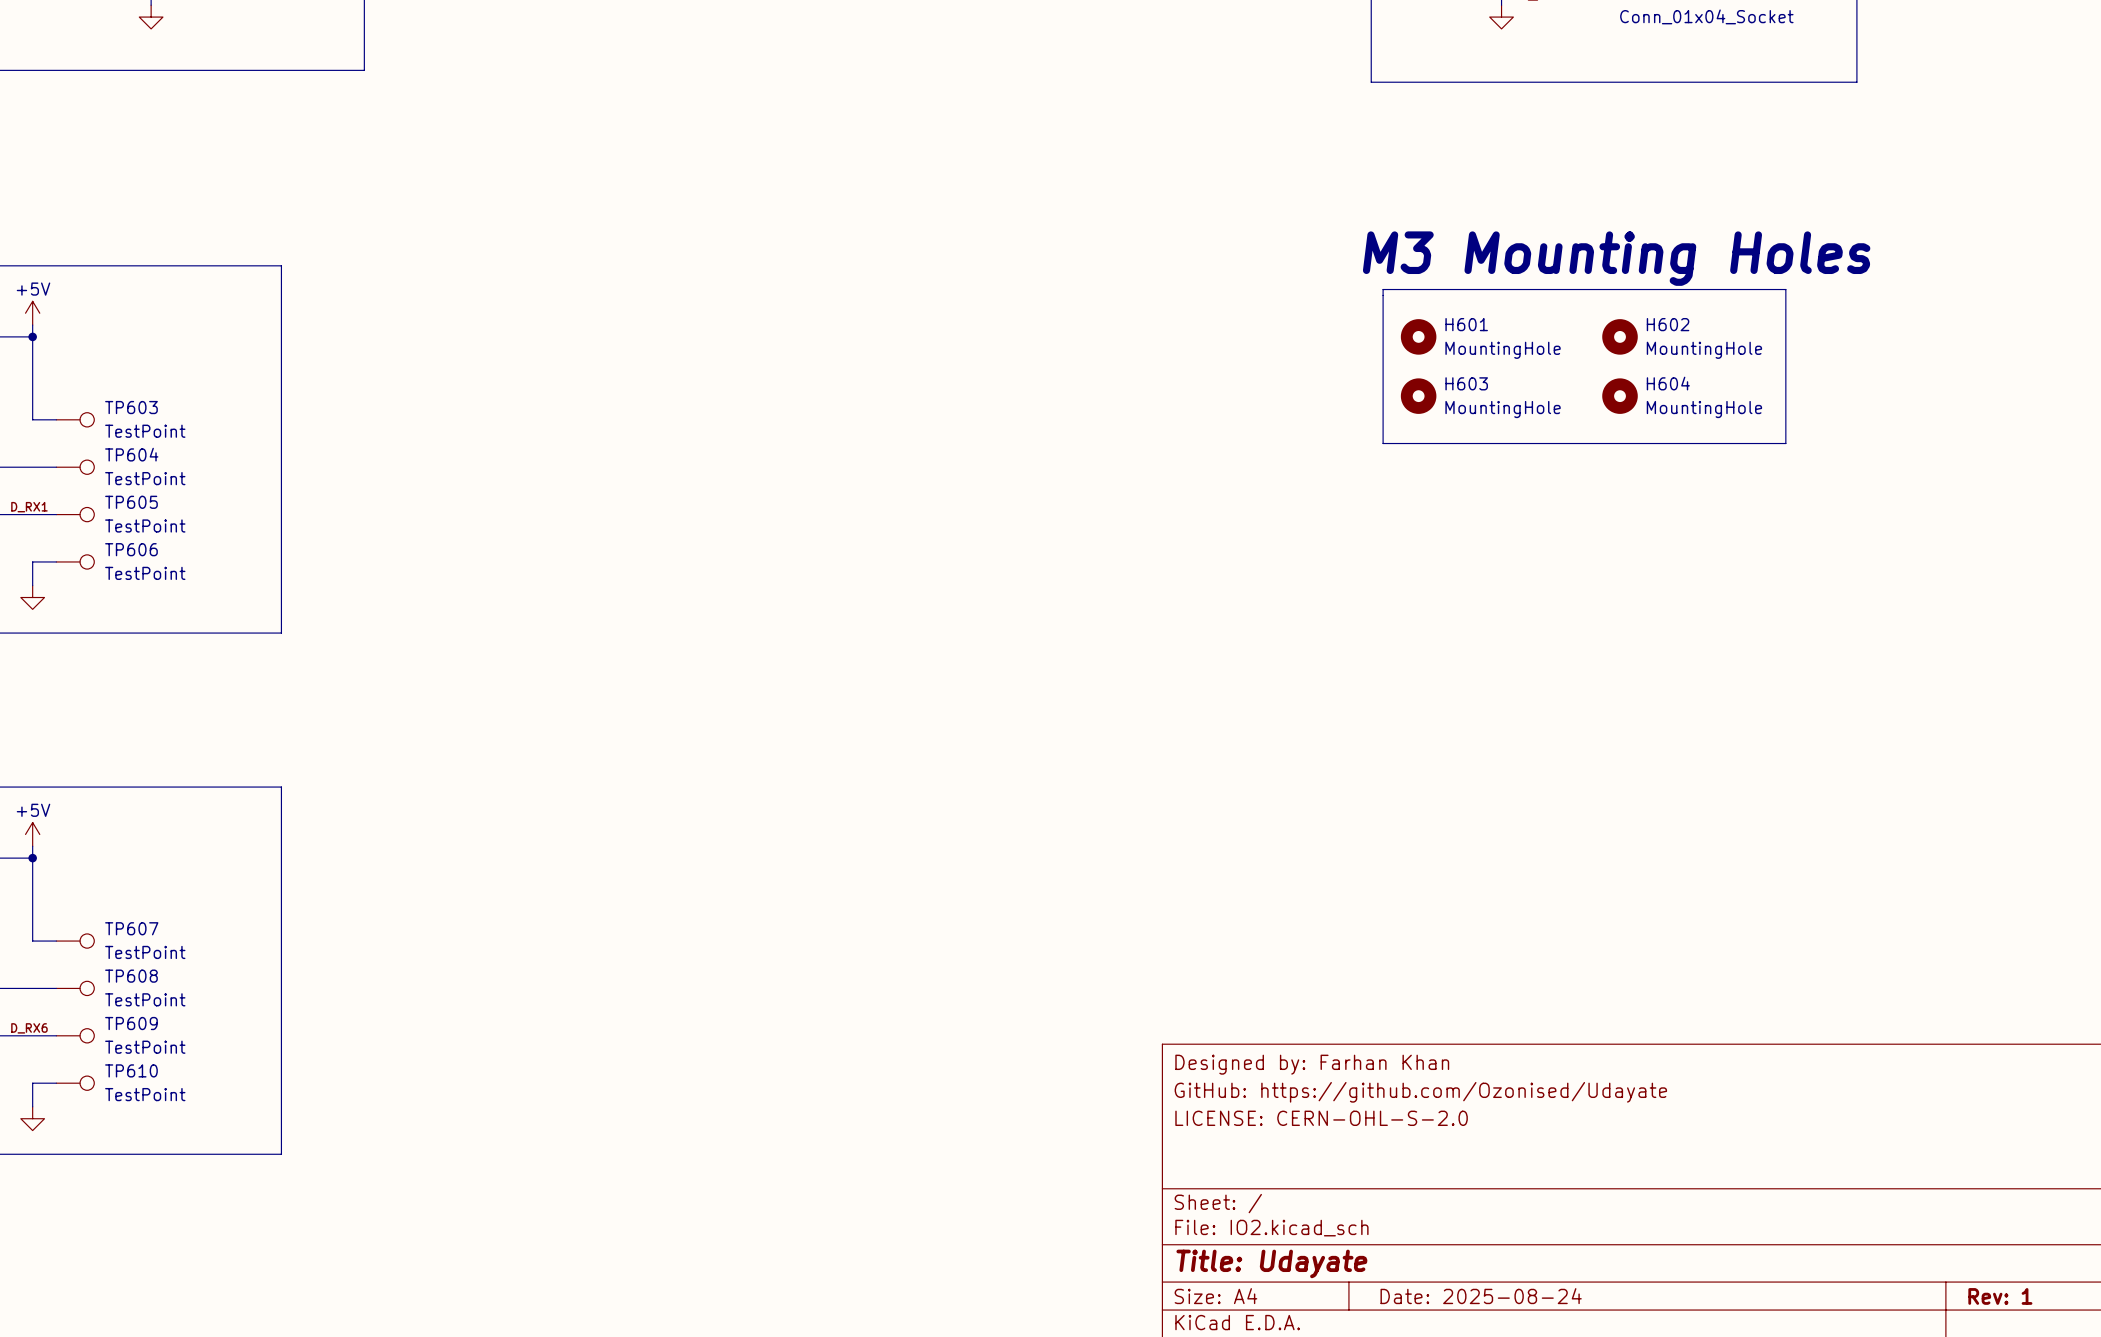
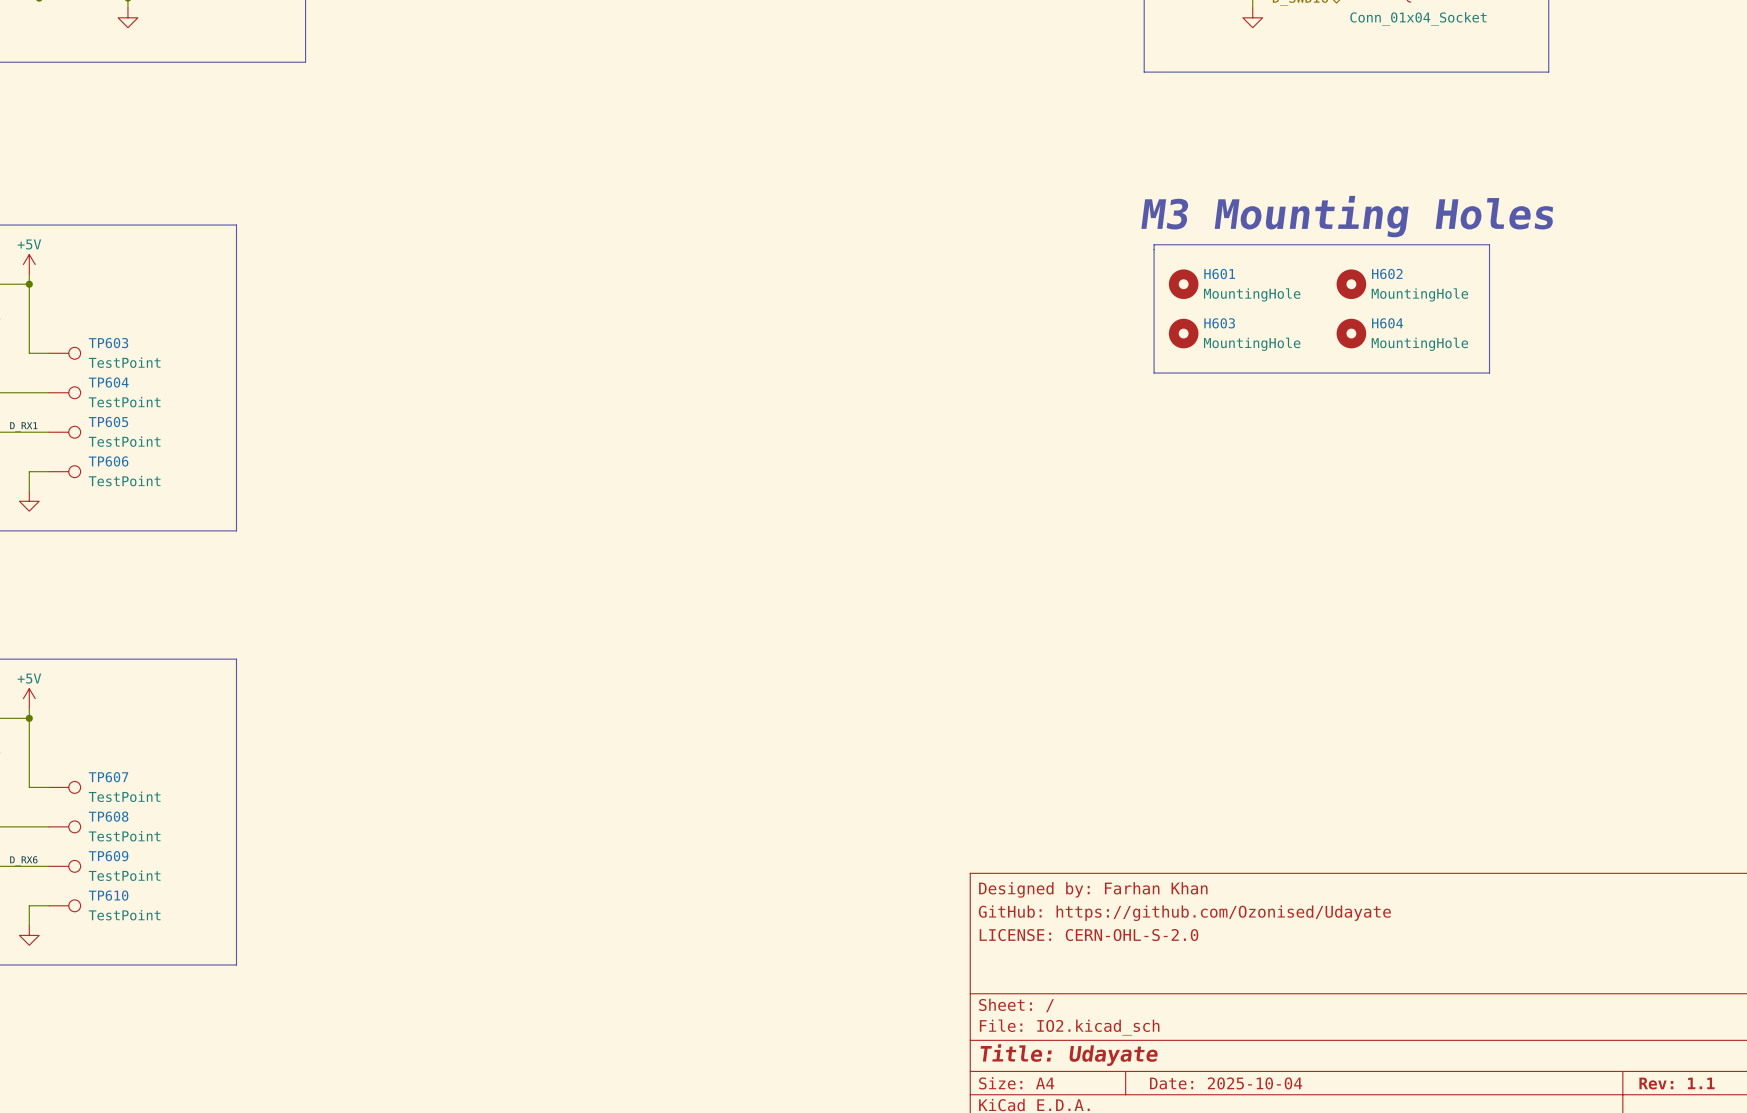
title block: Date: 2025-08-24 (1481, 1296) -> Date: 2025-10-04 (1226, 1083)
title block: Rev: 1 (2000, 1296) -> Rev: 1.1 (1677, 1083)

